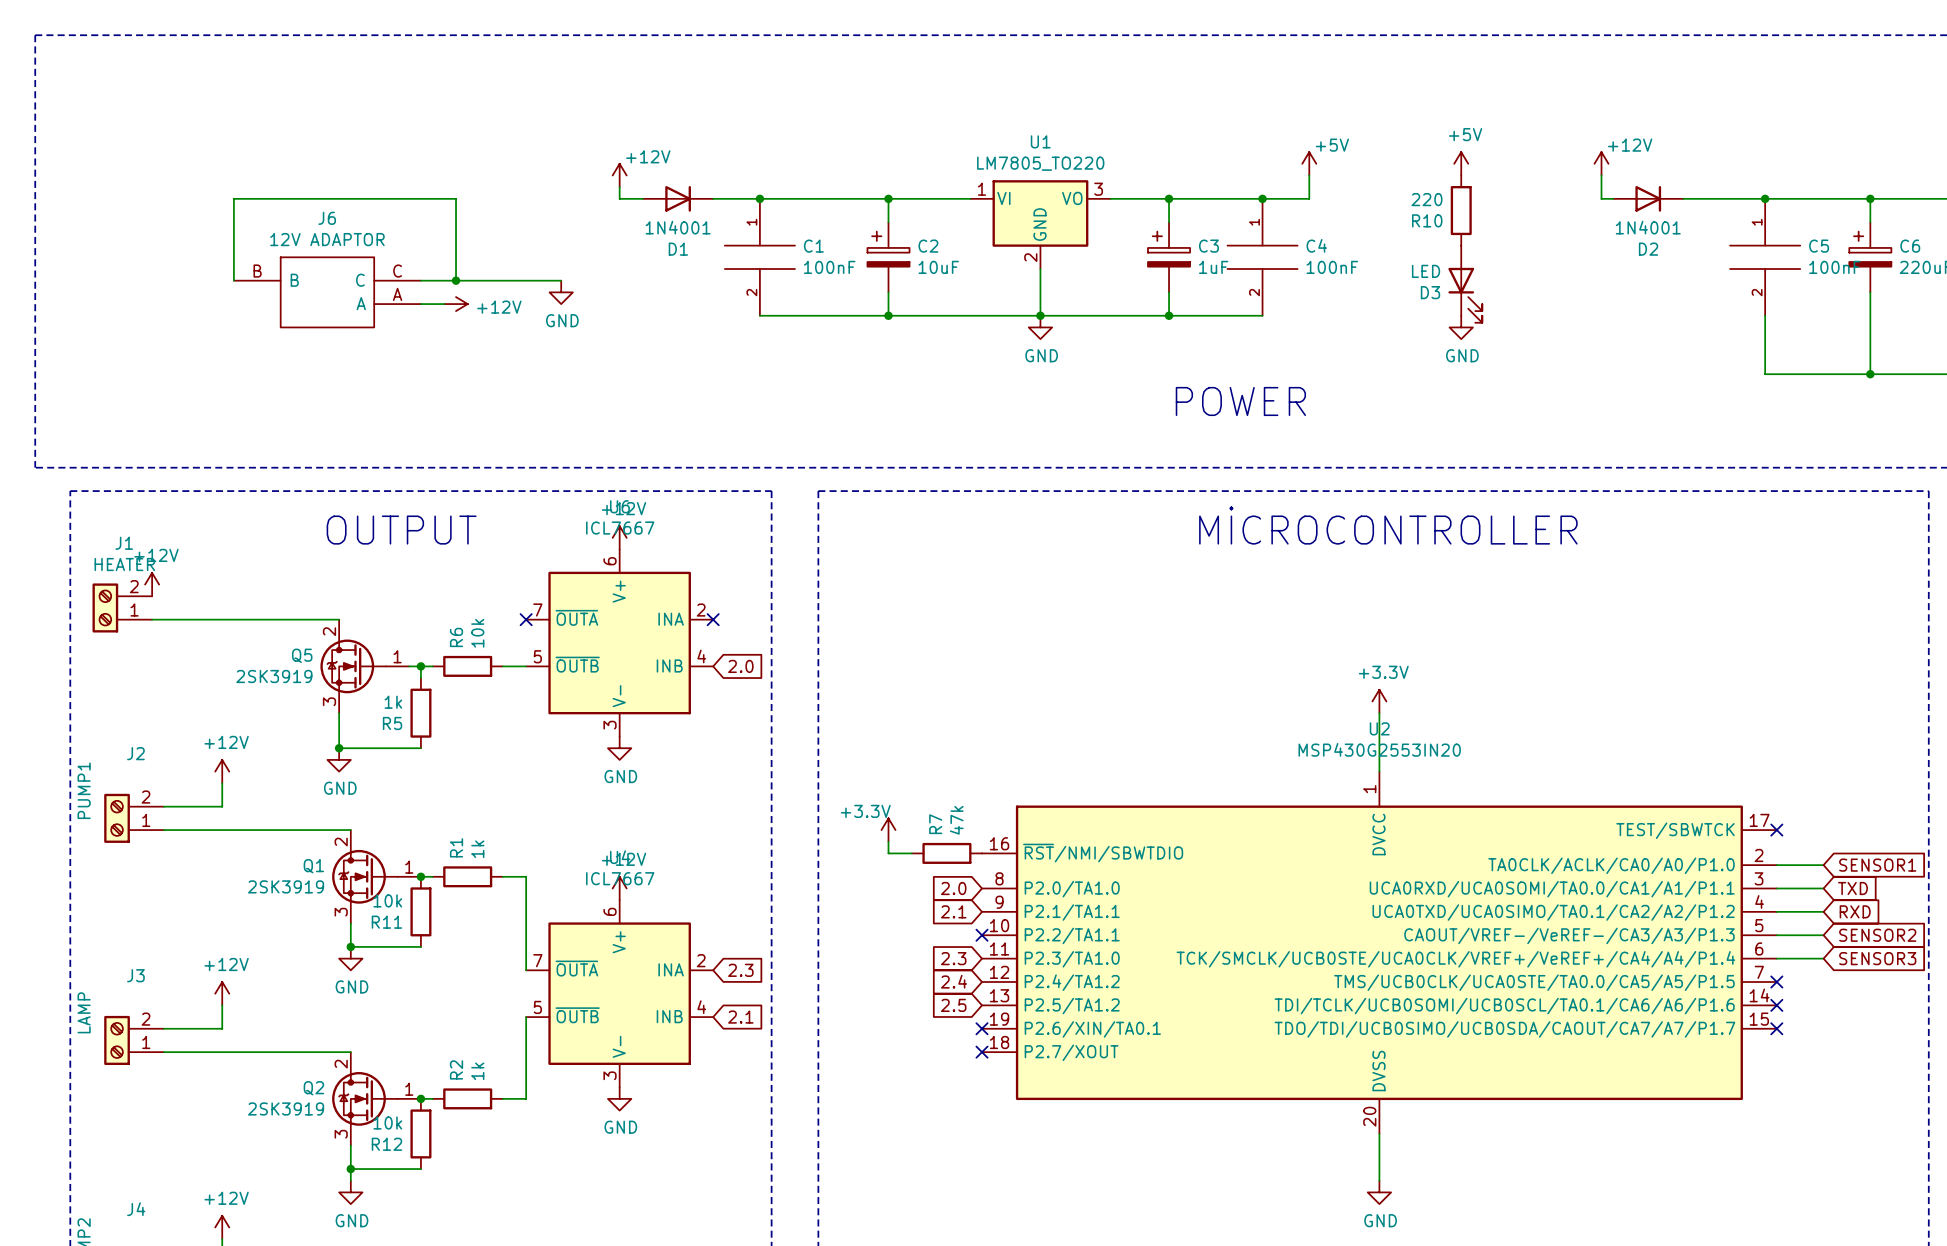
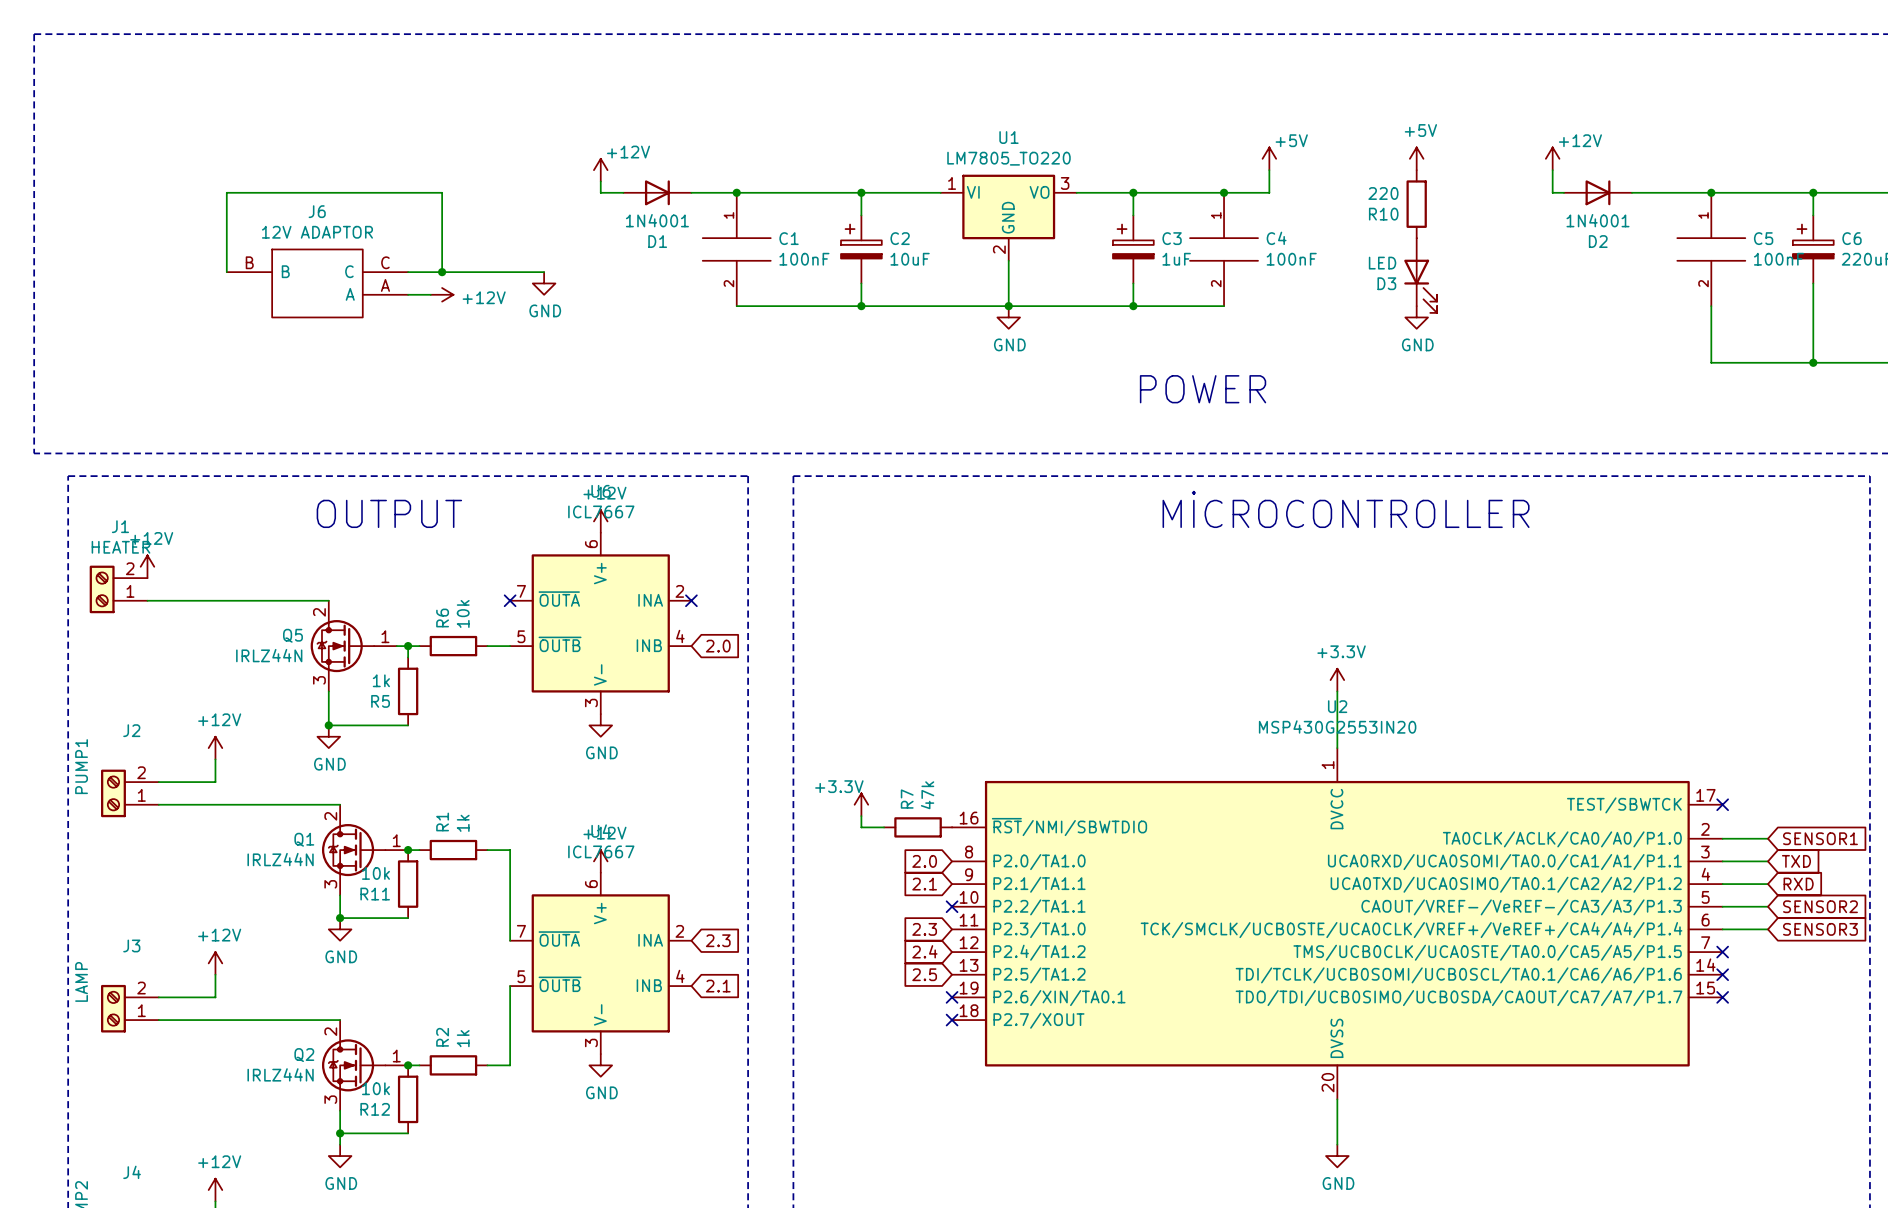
Q5 value: 2SK3919 (274, 676) -> IRLZ44N (269, 655)
Q1 value: 2SK3919 (286, 886) -> IRLZ44N (280, 859)
Q2 value: 2SK3919 (286, 1108) -> IRLZ44N (280, 1074)

